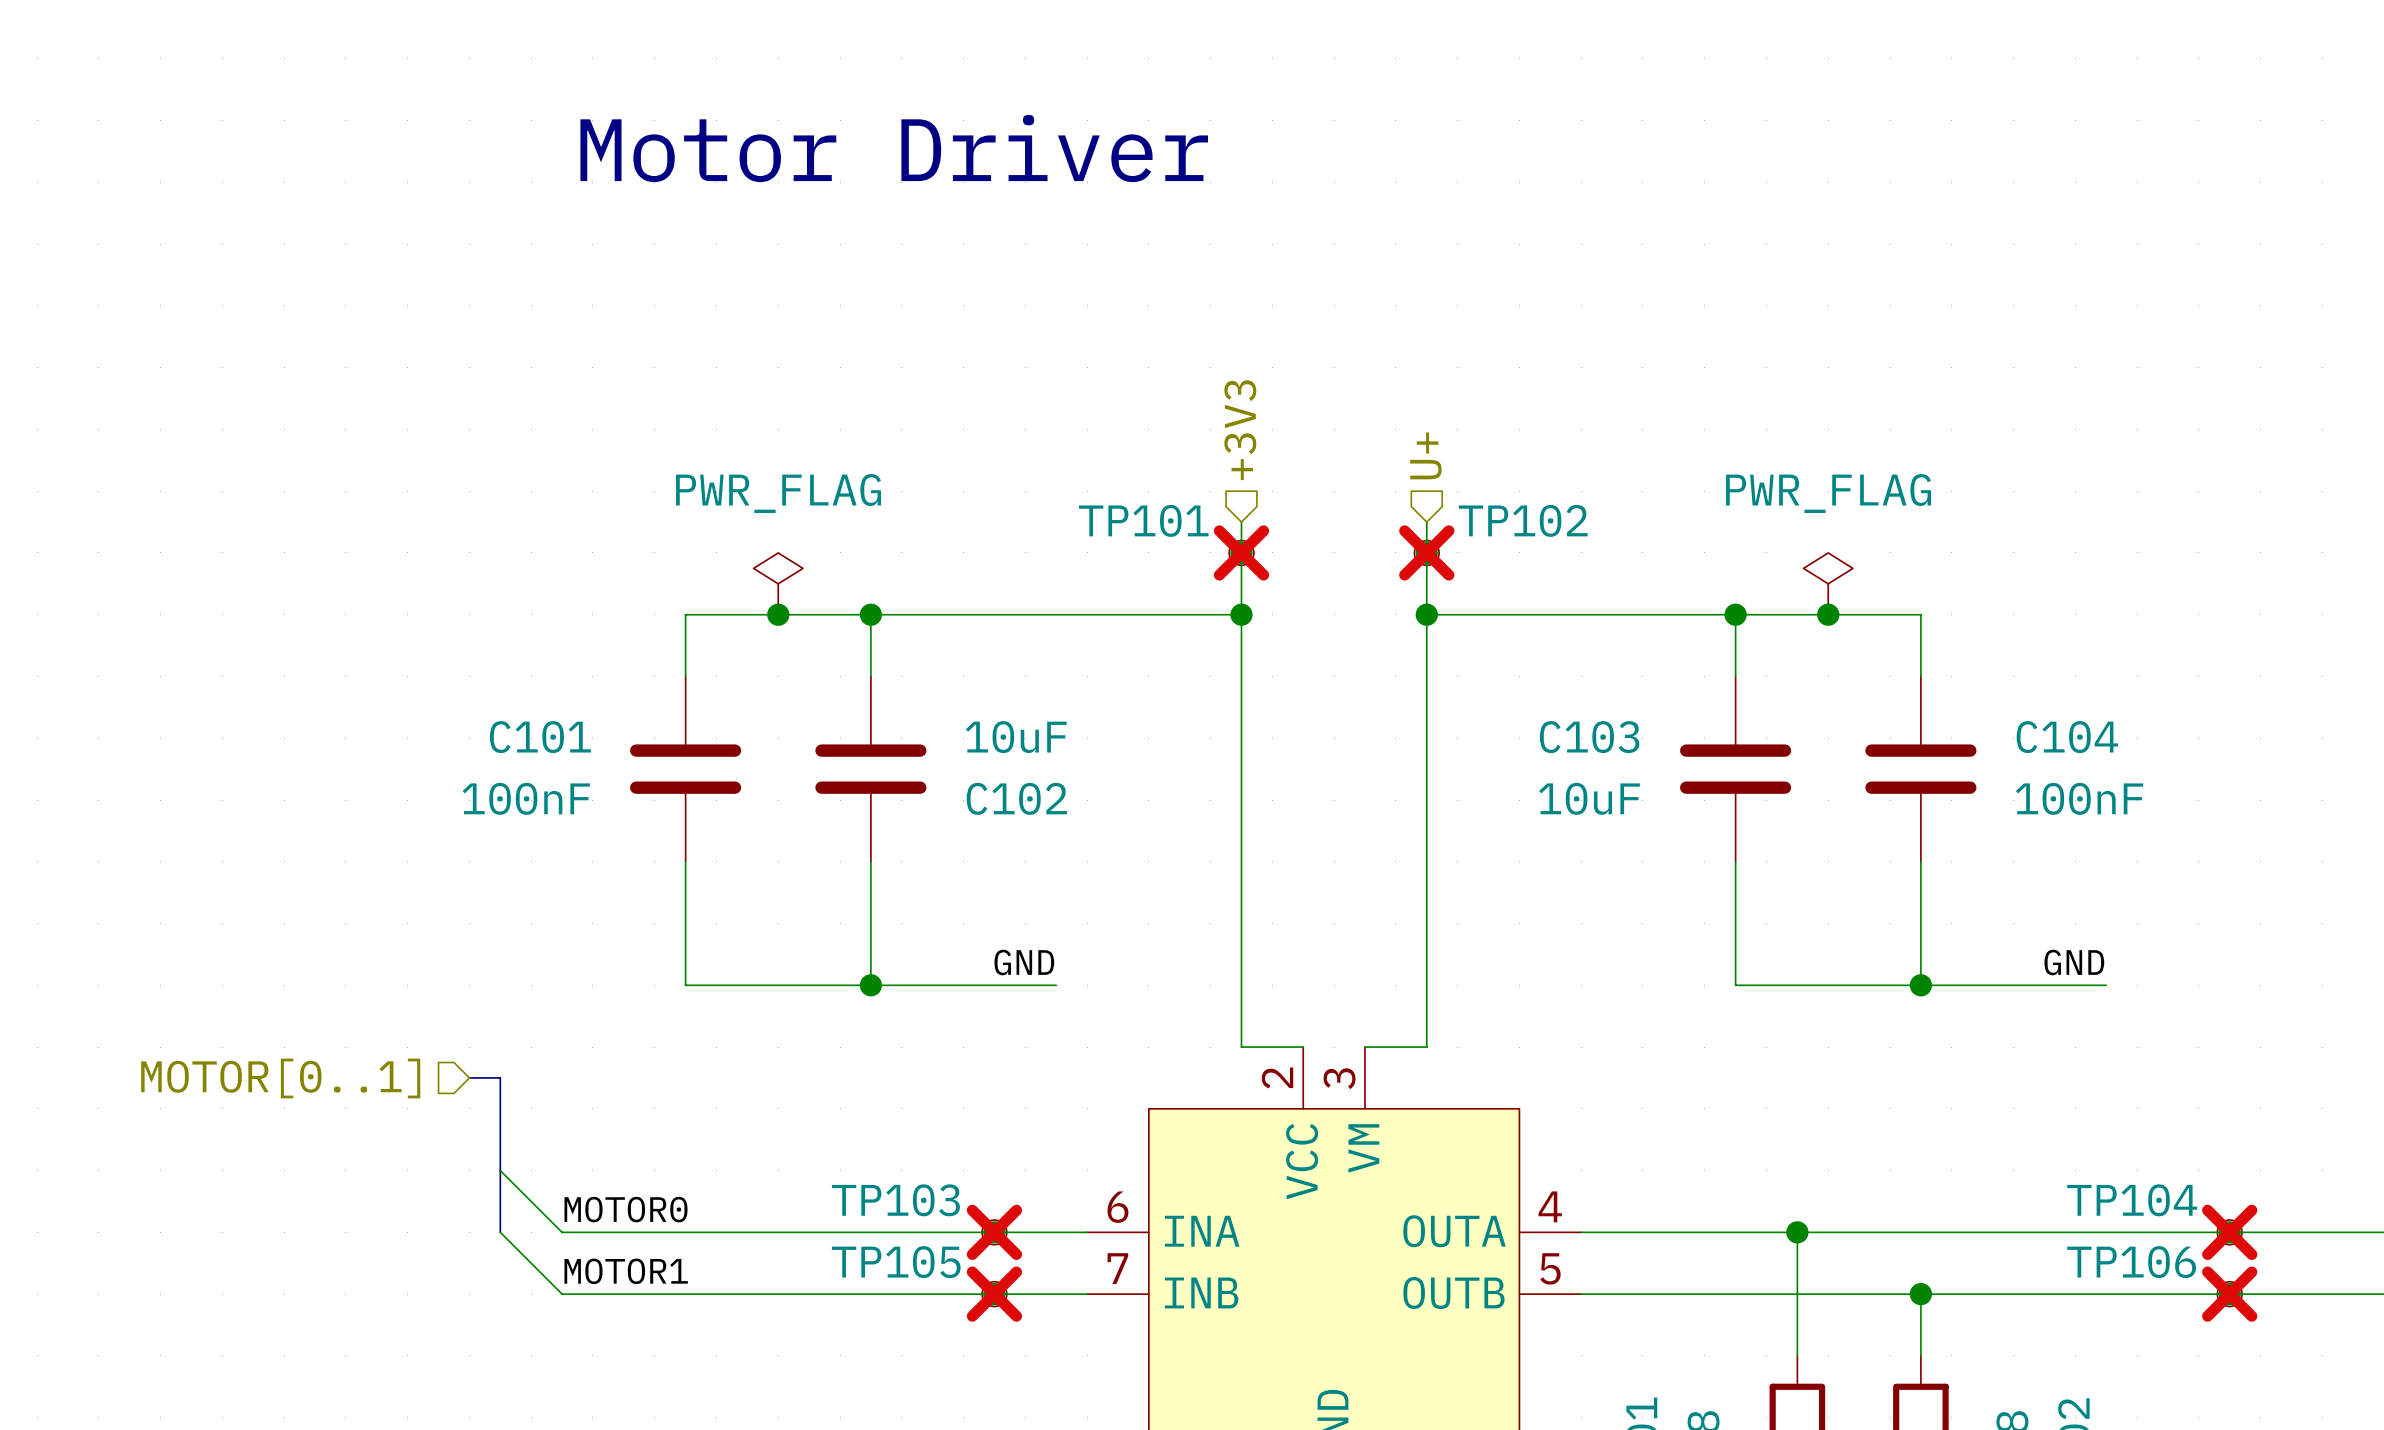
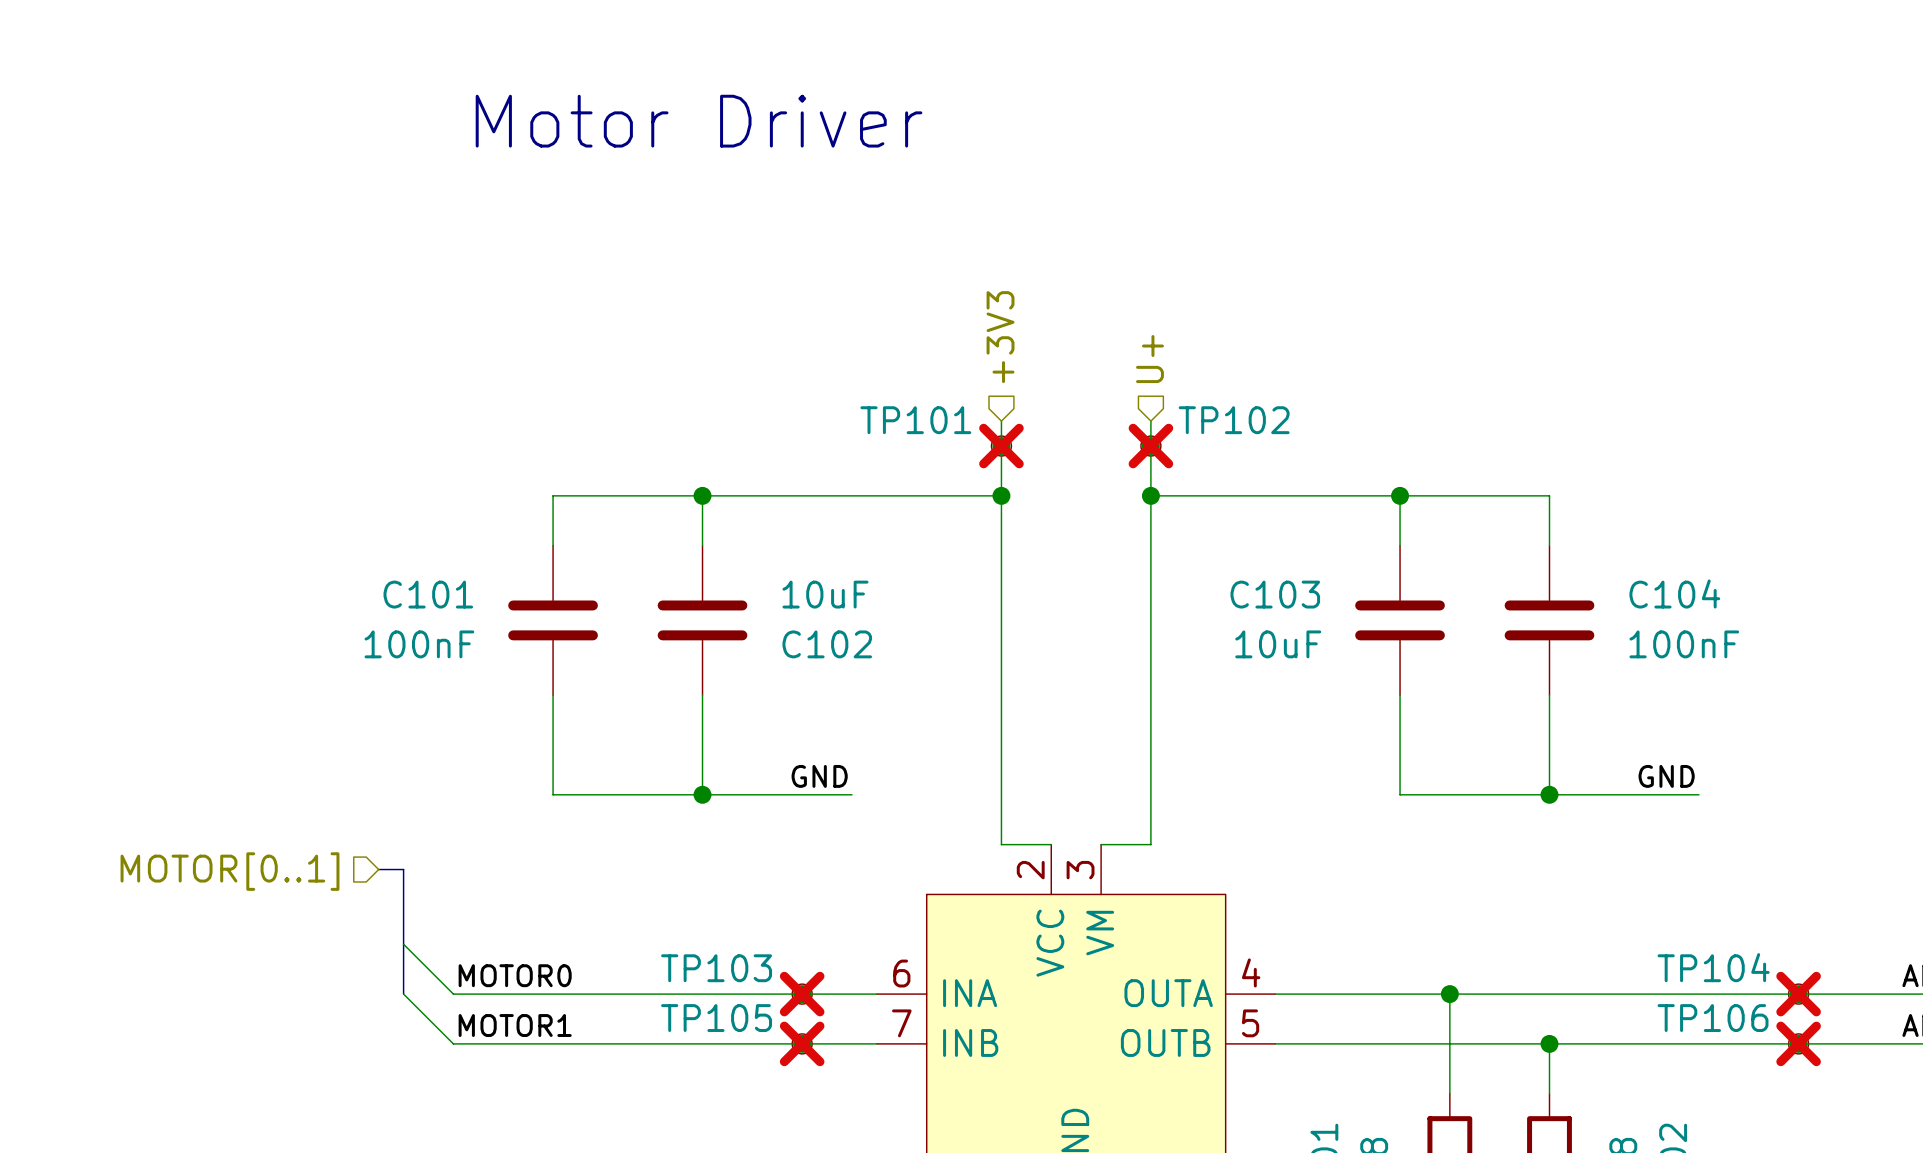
power symbol: PWR_FLAG (778, 583) -> none
power symbol: PWR_FLAG (1828, 583) -> none
junction: (778, 614) -> none
junction: (1828, 614) -> none

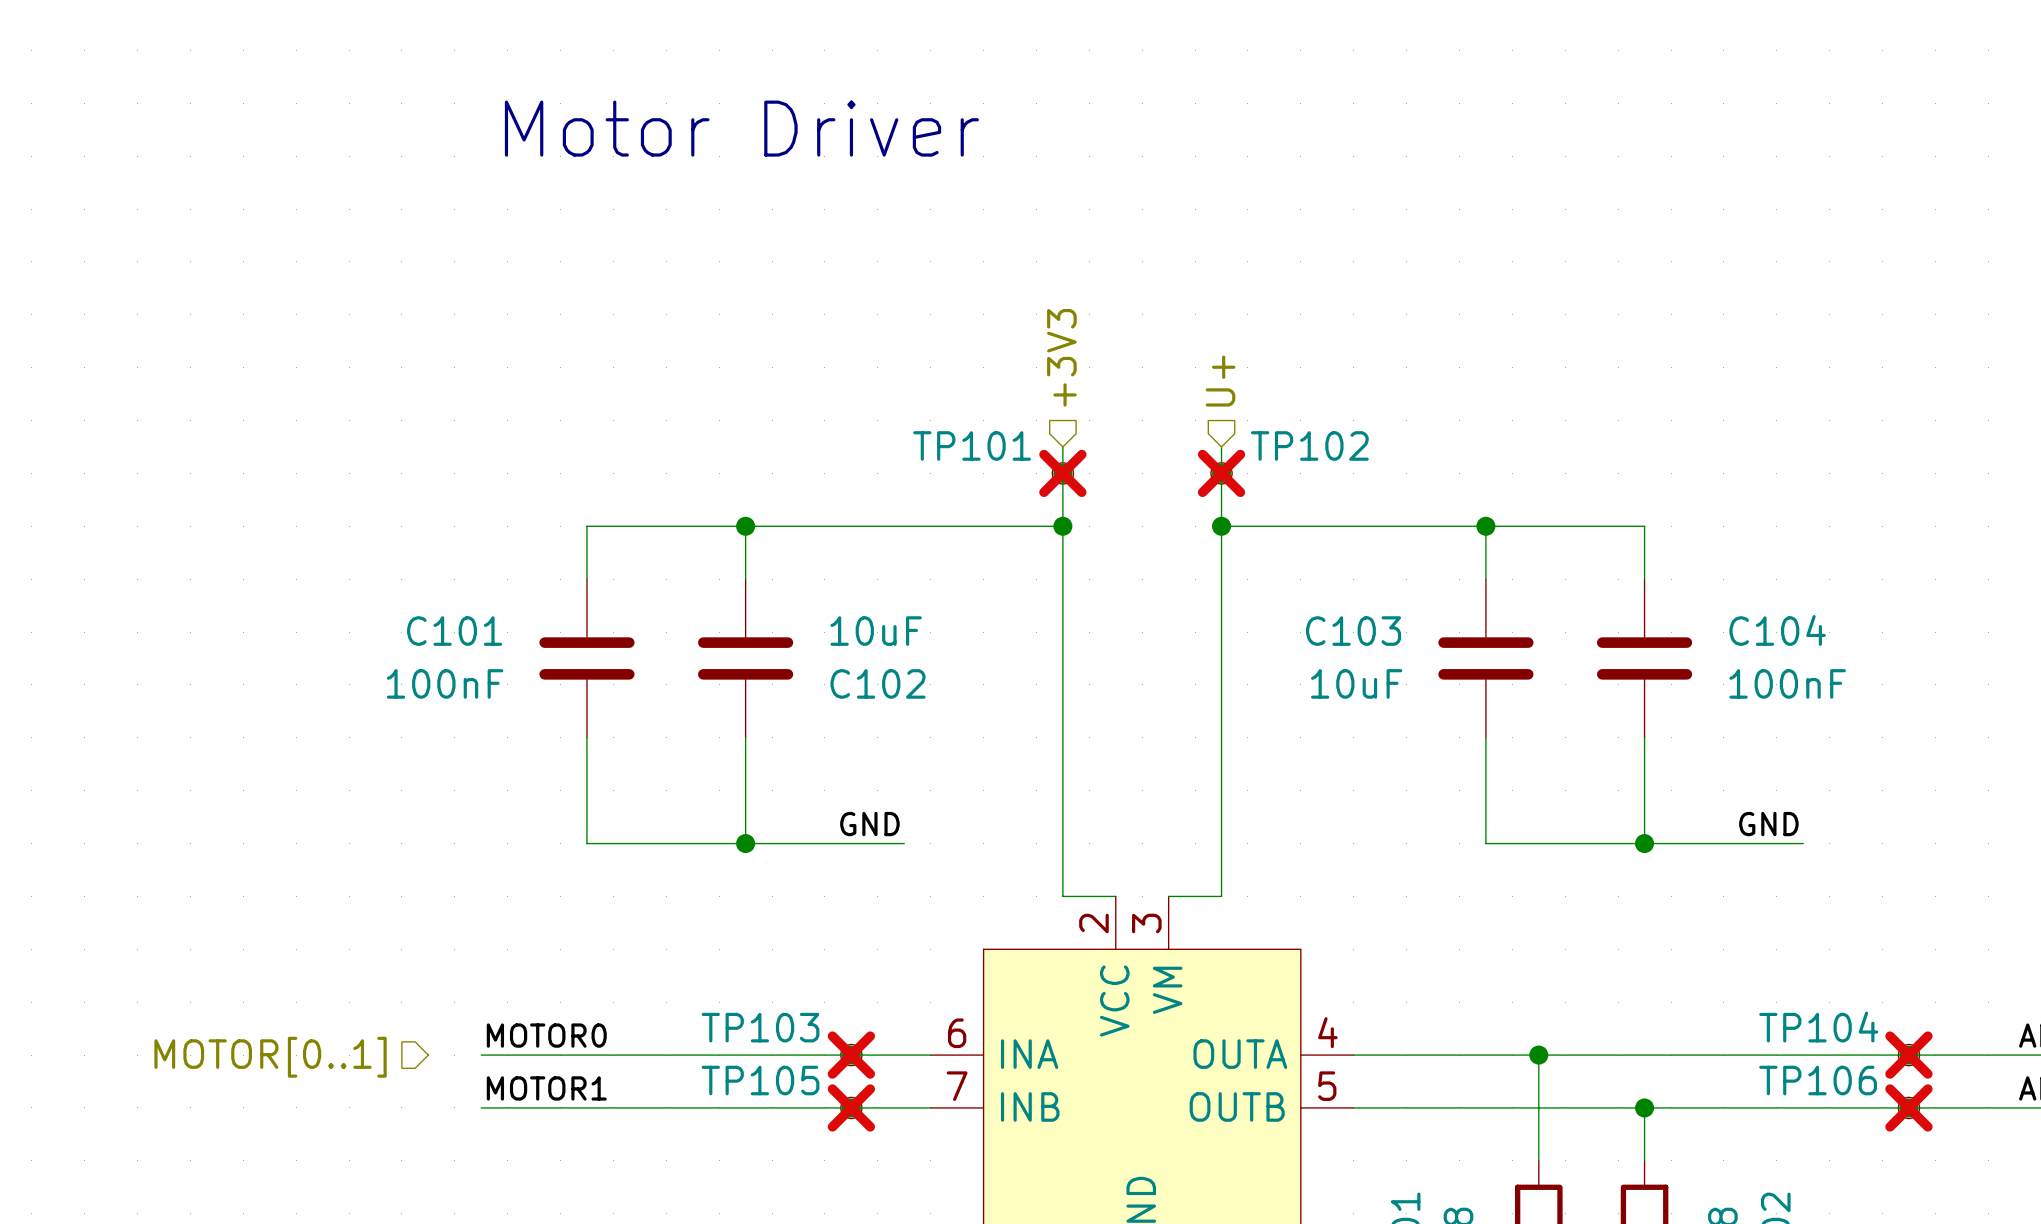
bus: (378, 869) (403, 869) (403, 994) -> none
hierarchical label position: MOTOR[0..1] (230, 871) -> MOTOR[0..1] (270, 1057)
wire: (403, 944) (453, 994) -> none
wire: (403, 994) (453, 1043) -> none

